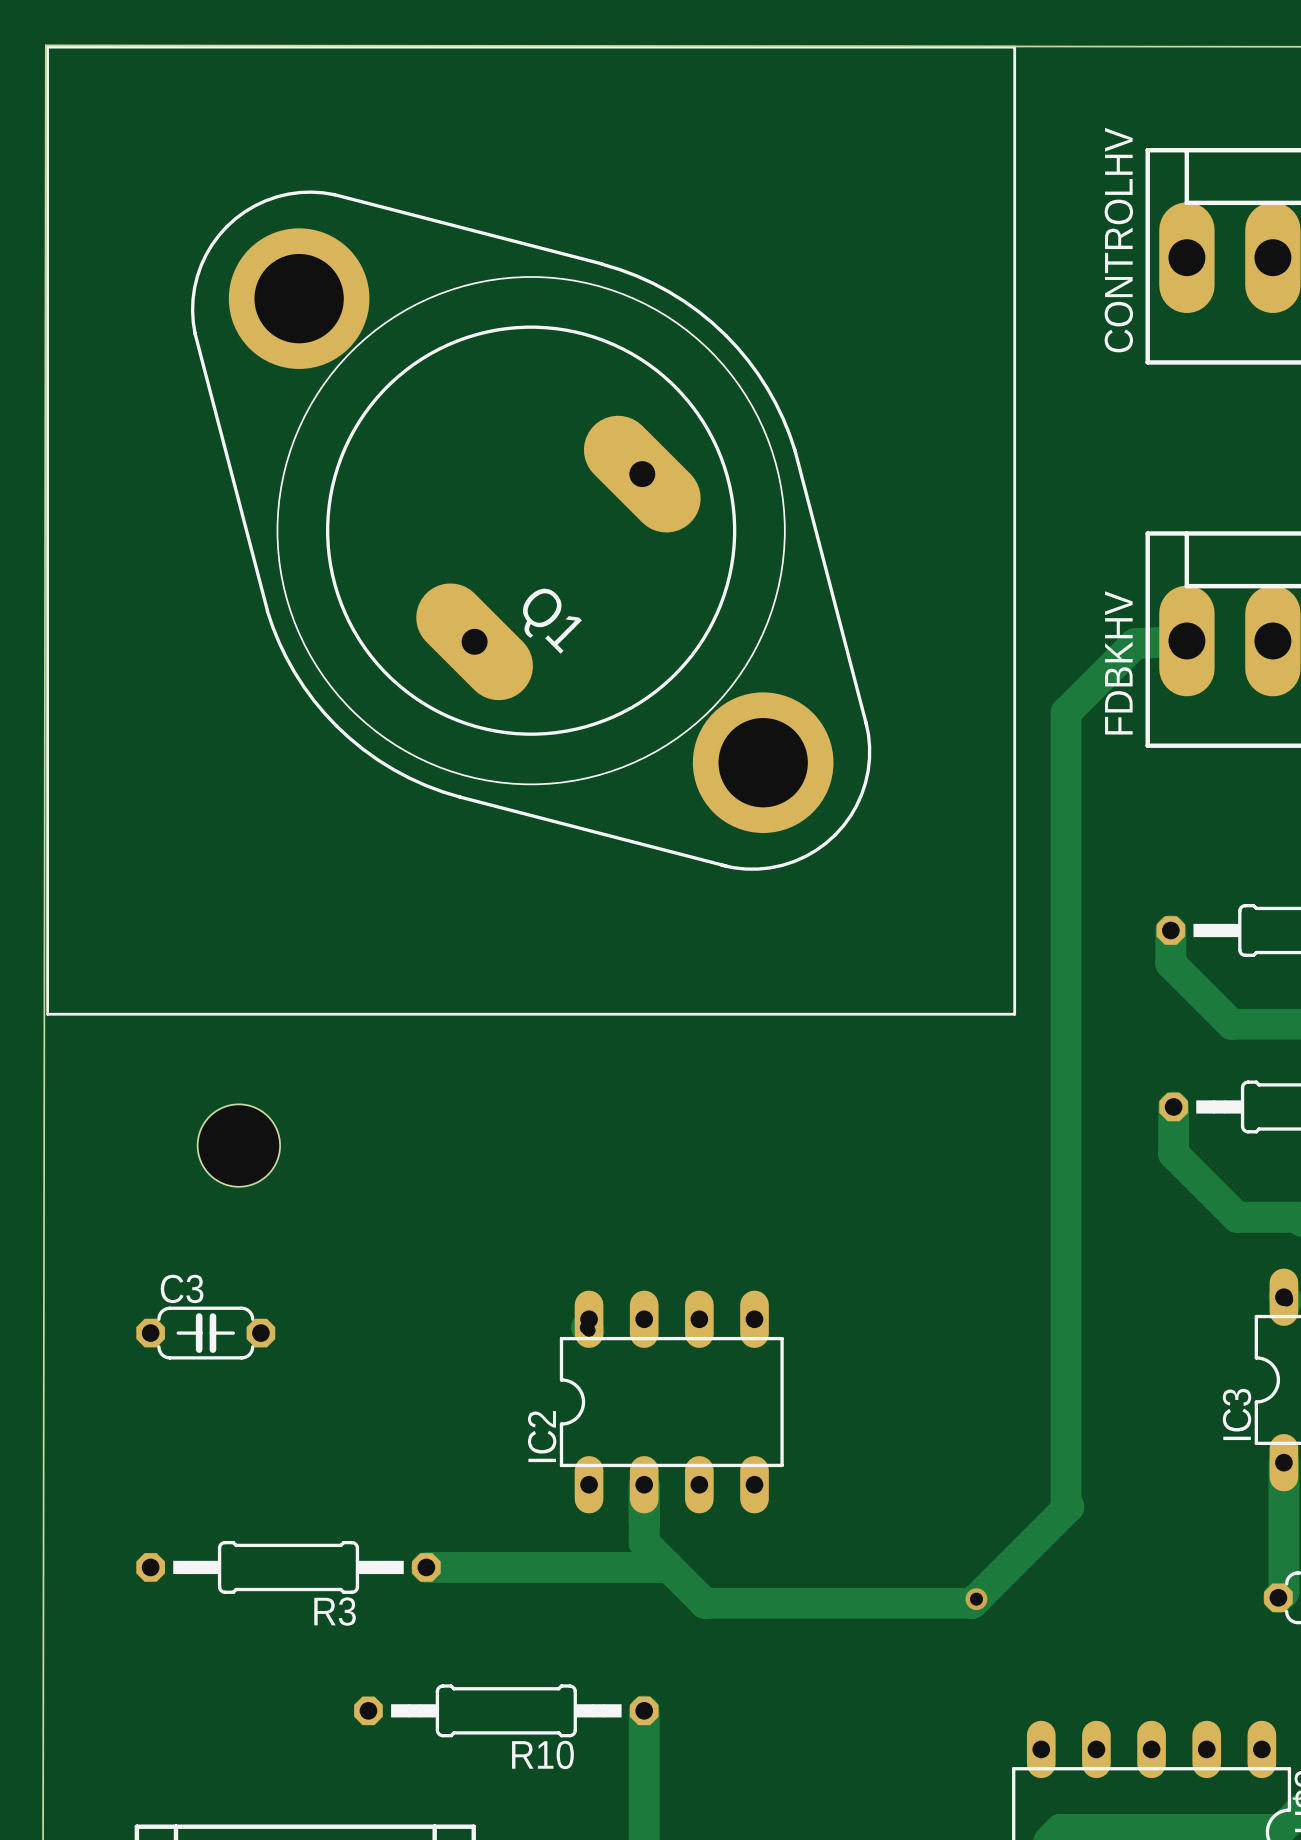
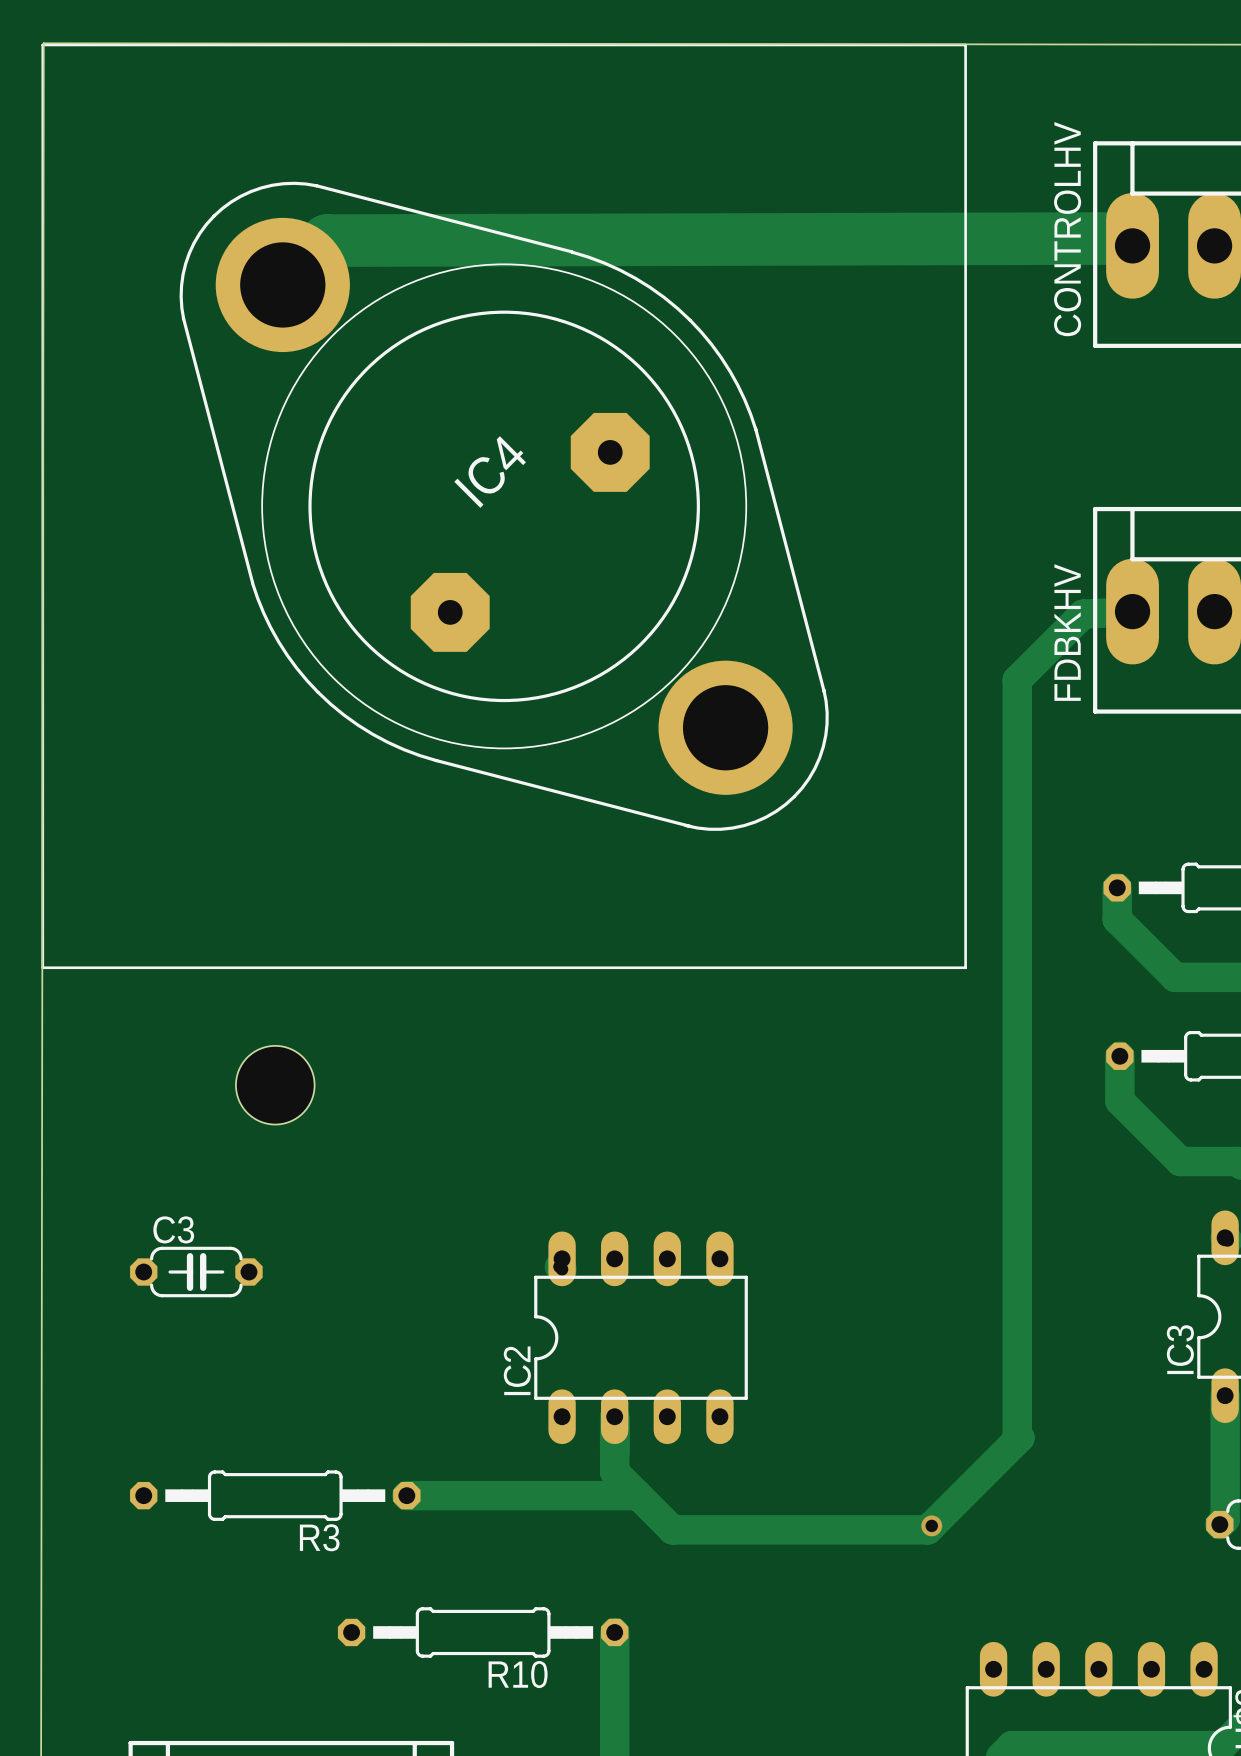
track: none -> (1132, 245) (1130, 238) (327, 240) (282, 284)
IC4: none -> (504, 506)
Q1: (531, 530) -> none
hole position: (238, 1145) -> (275, 1085)

